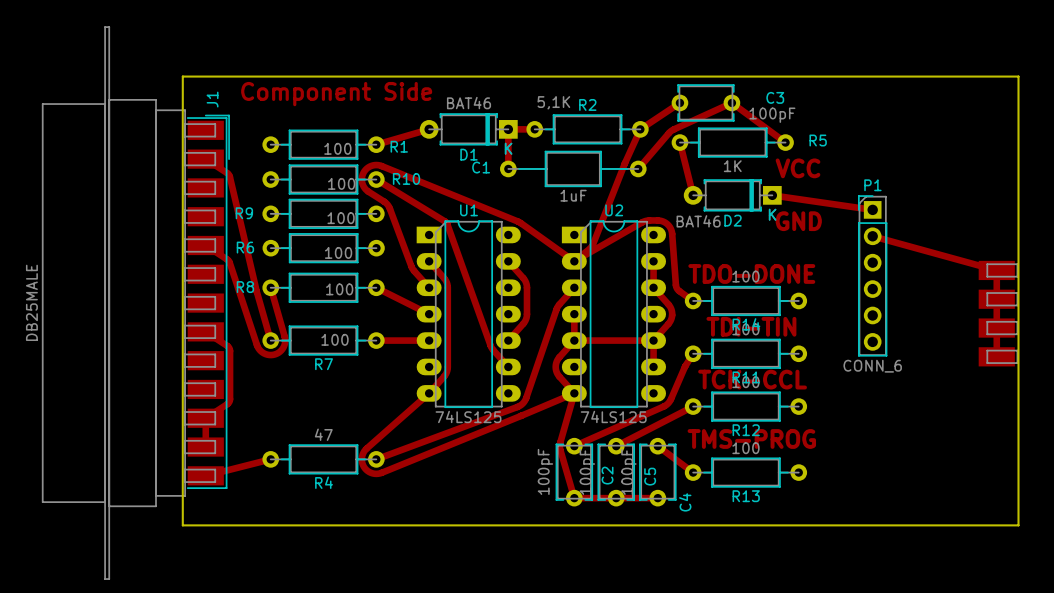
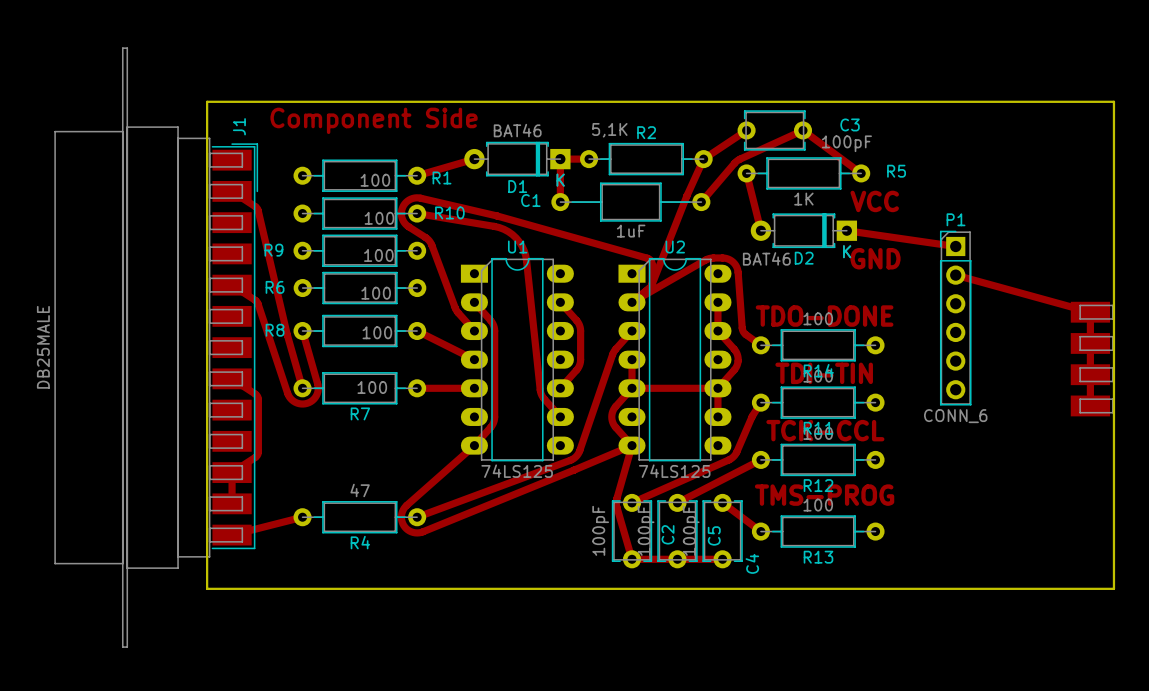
track: (376, 179) (446, 223) (493, 350) -> (417, 213) (499, 227) (508, 231) (519, 241) (526, 260) (540, 389) (544, 398)
track: (368, 191) (362, 183) (363, 172) (371, 165) (381, 166) (519, 222) (574, 261) -> (408, 226) (403, 221) (401, 211) (405, 202) (414, 198) (496, 215) (648, 258) (652, 264) (652, 283) (649, 287)

